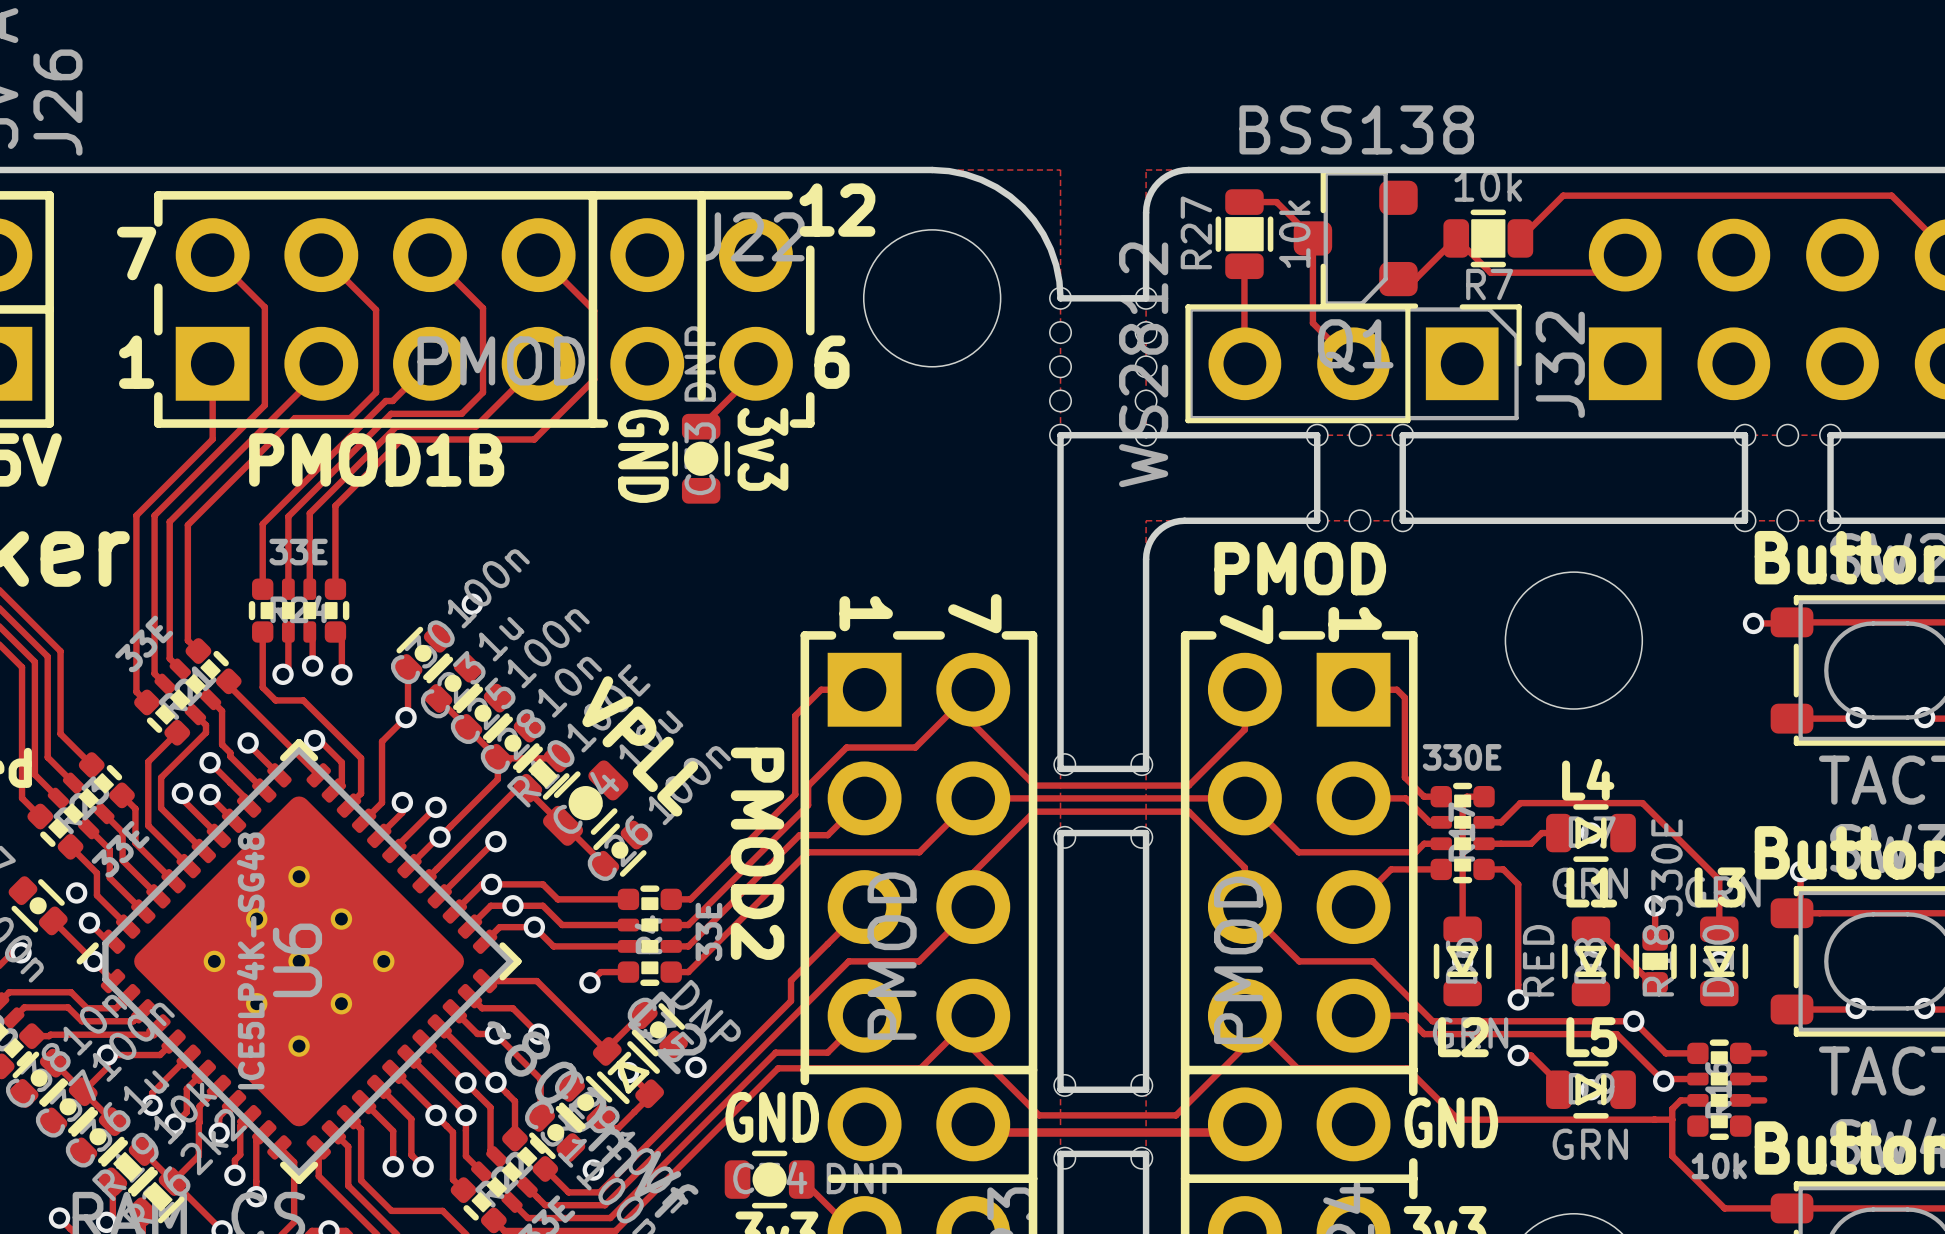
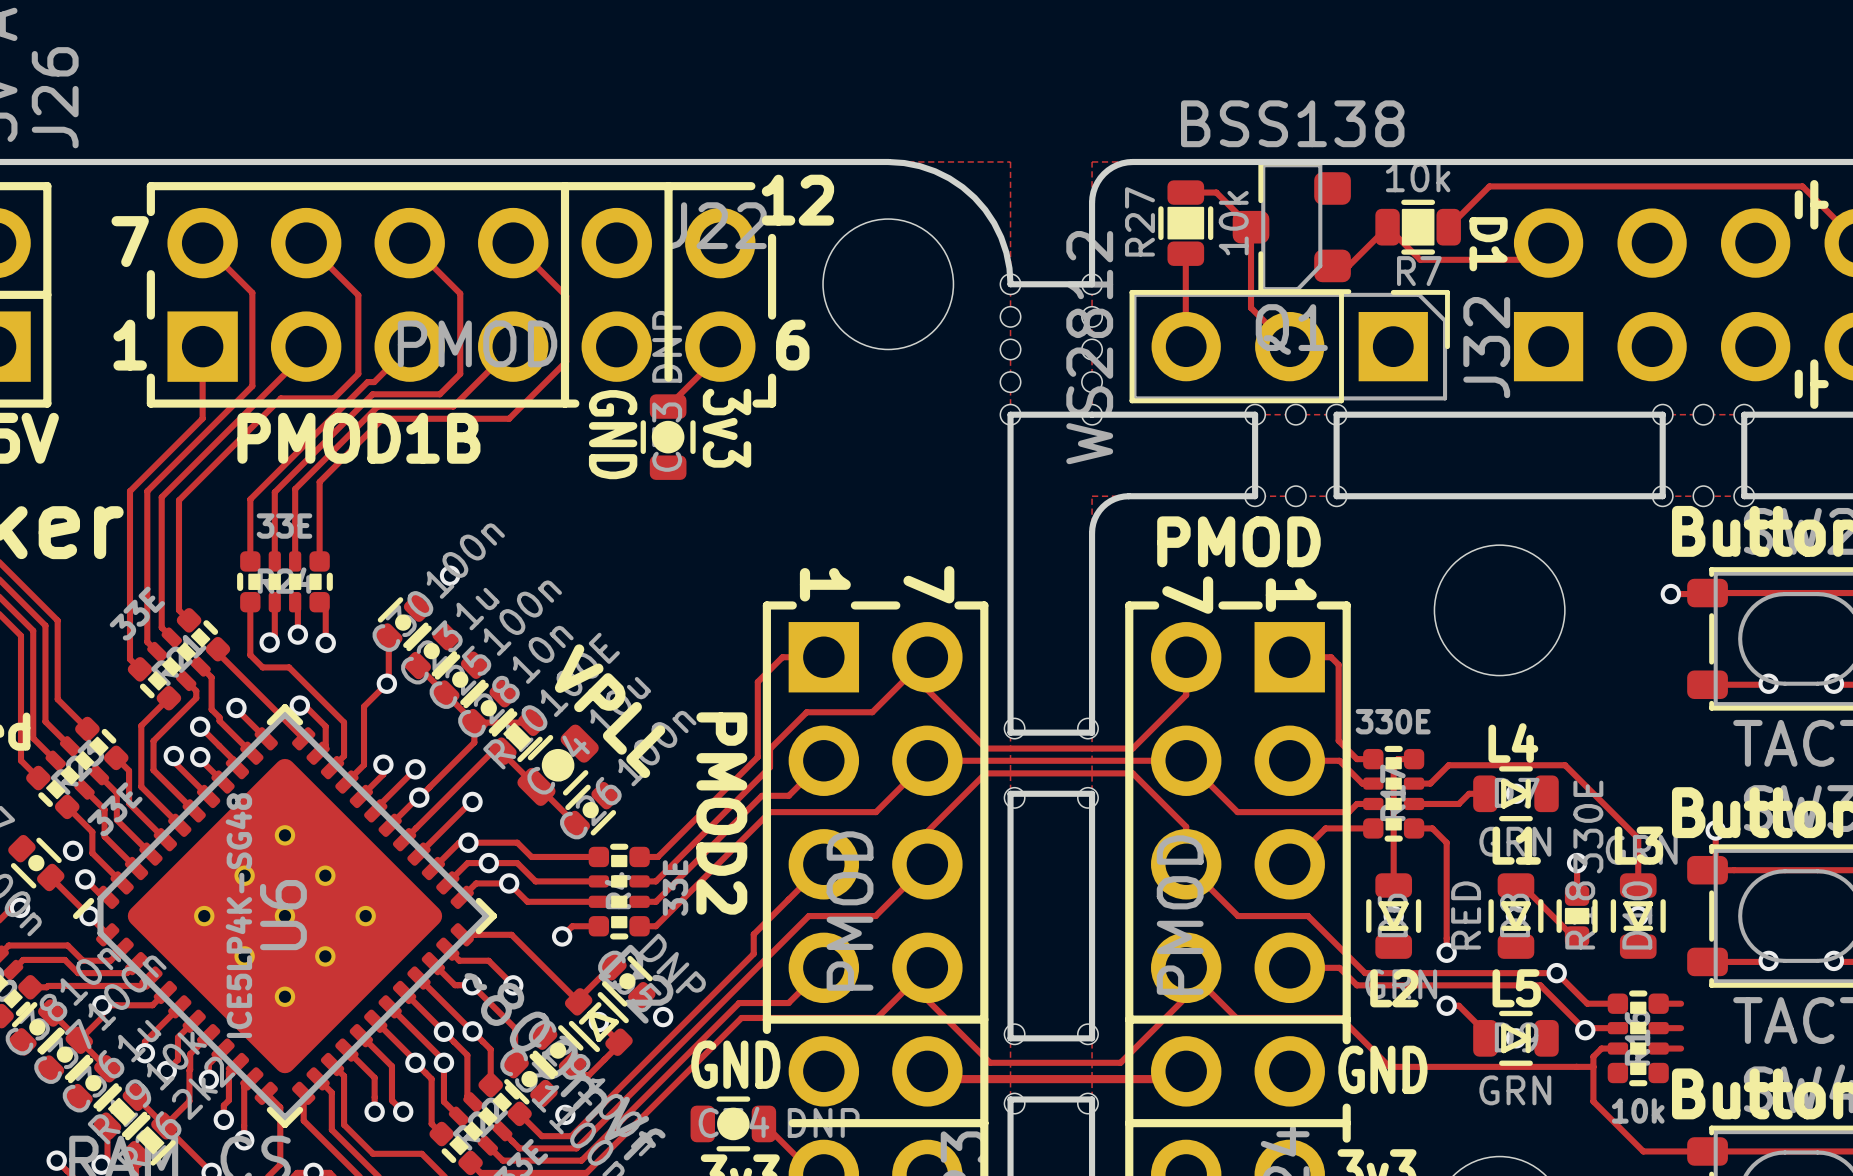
line: none -> (1814, 184) (1814, 225)
line: none -> (1798, 194) (1798, 215)
line: none -> (1814, 204) (1824, 204)
text: none -> D1 (1488, 244)
line: none -> (1814, 363) (1814, 404)
line: none -> (1798, 373) (1798, 394)
line: none -> (1814, 384) (1824, 384)

